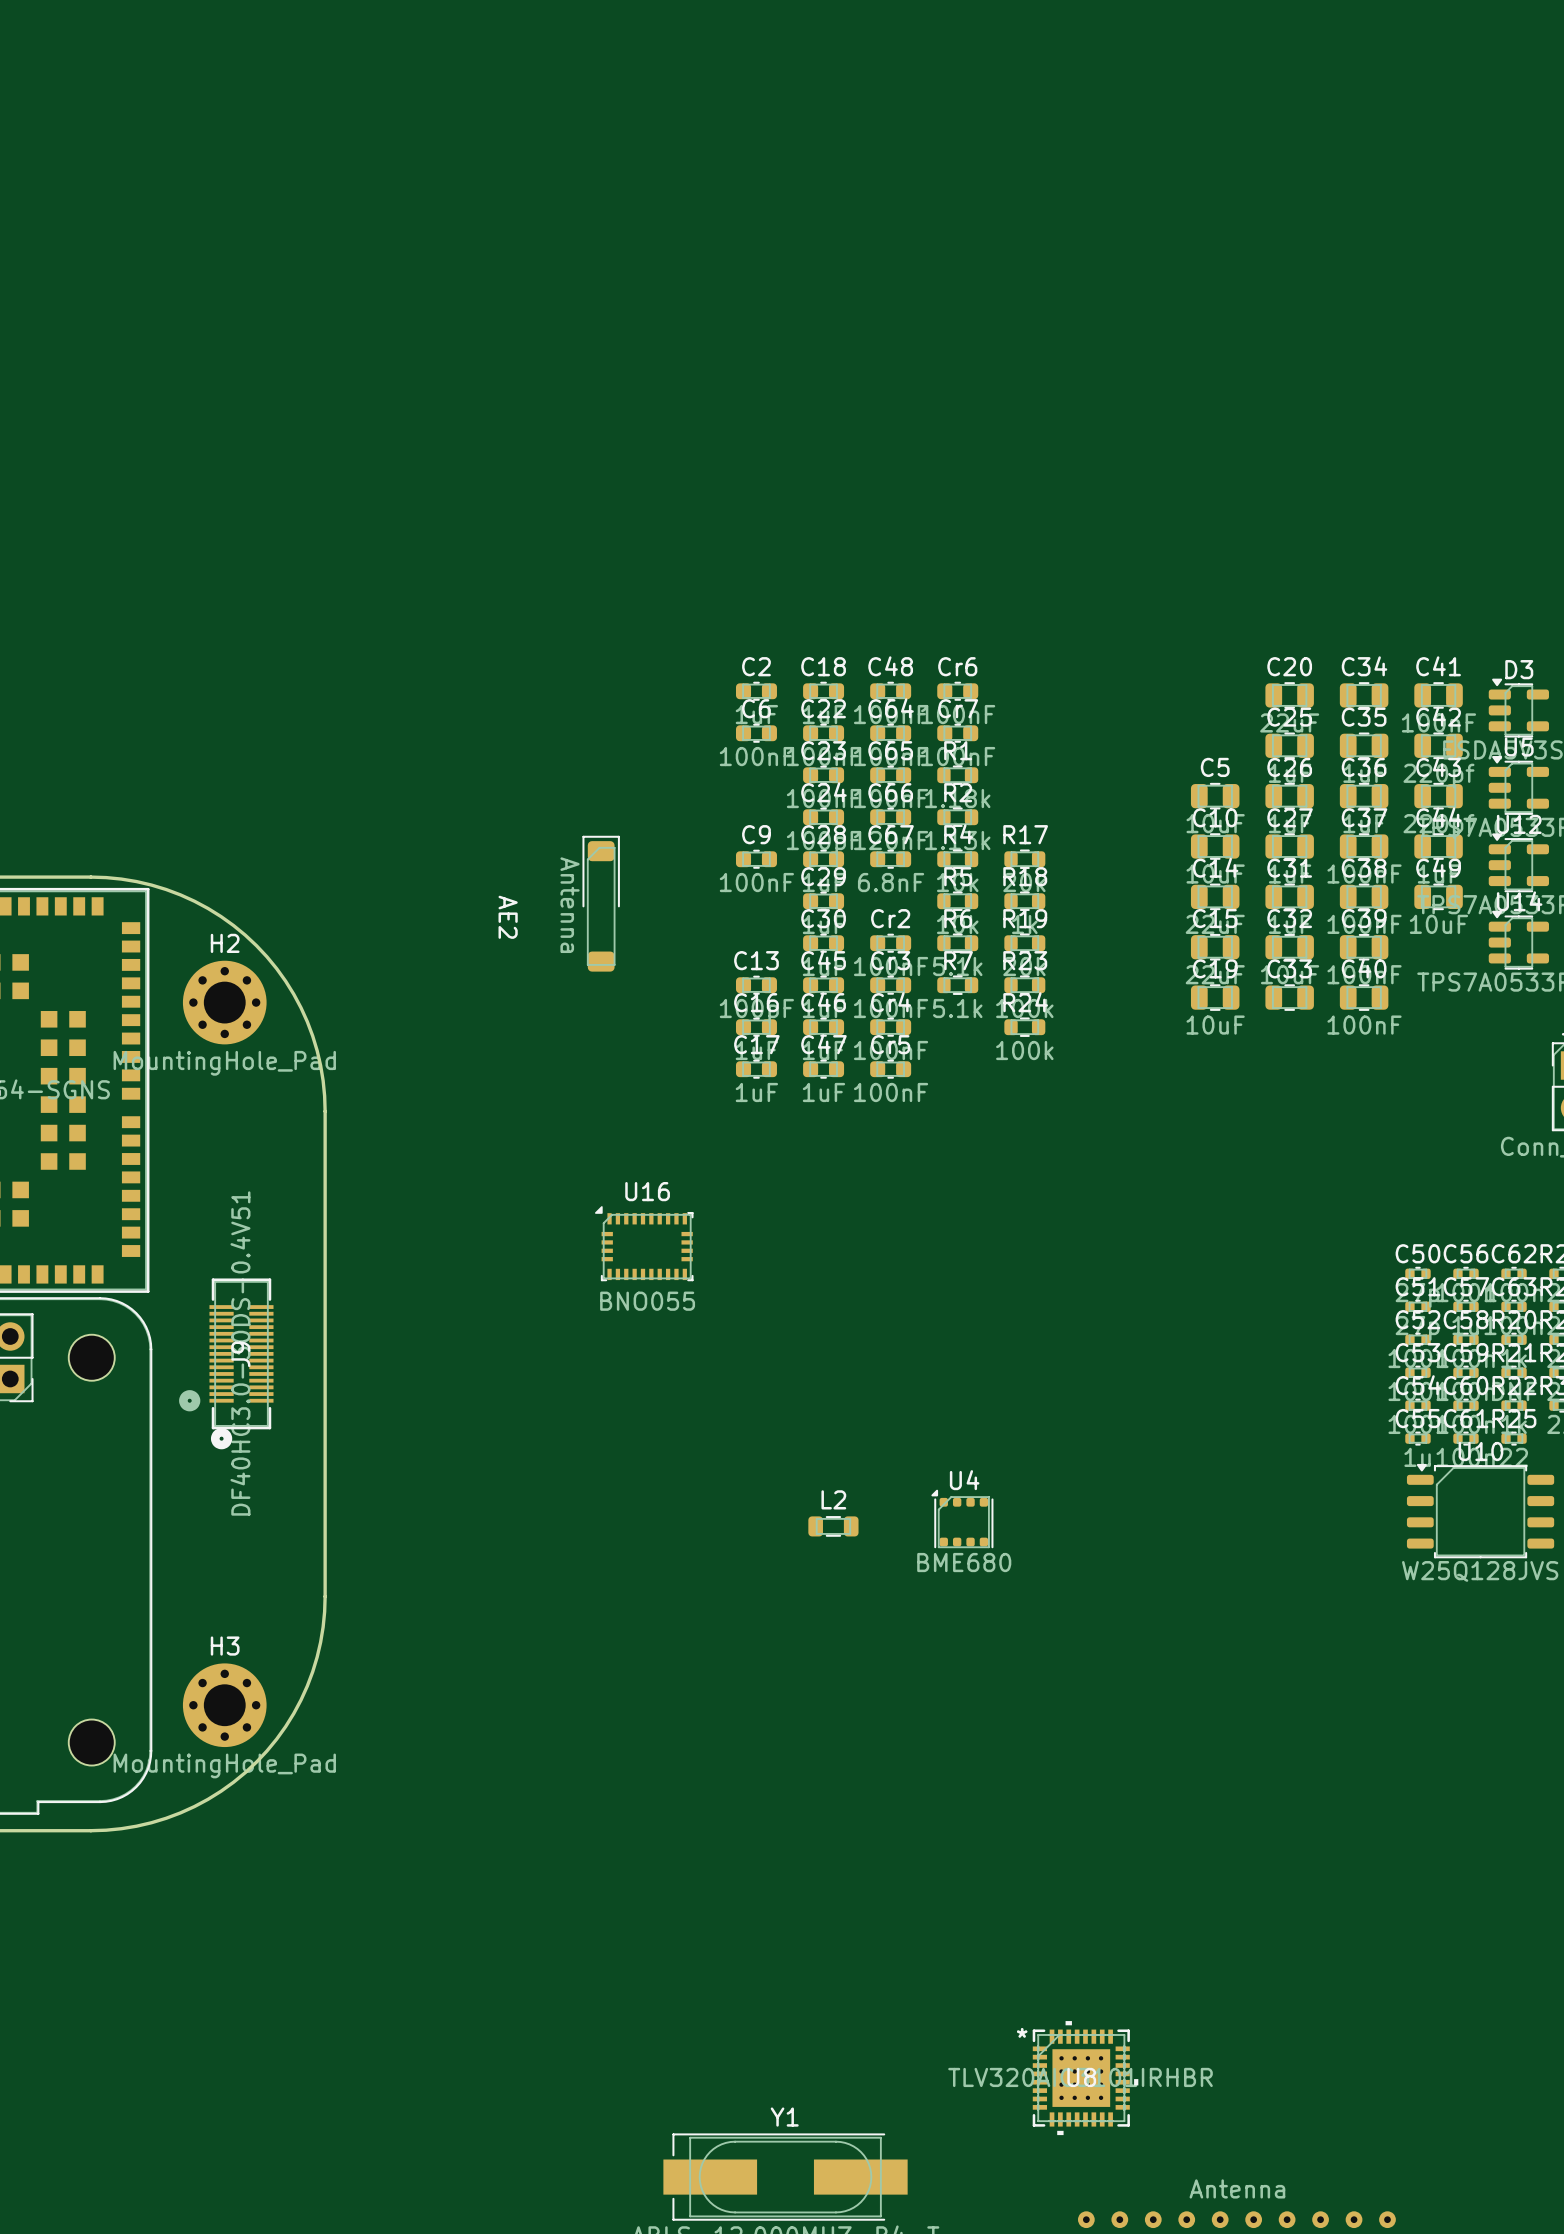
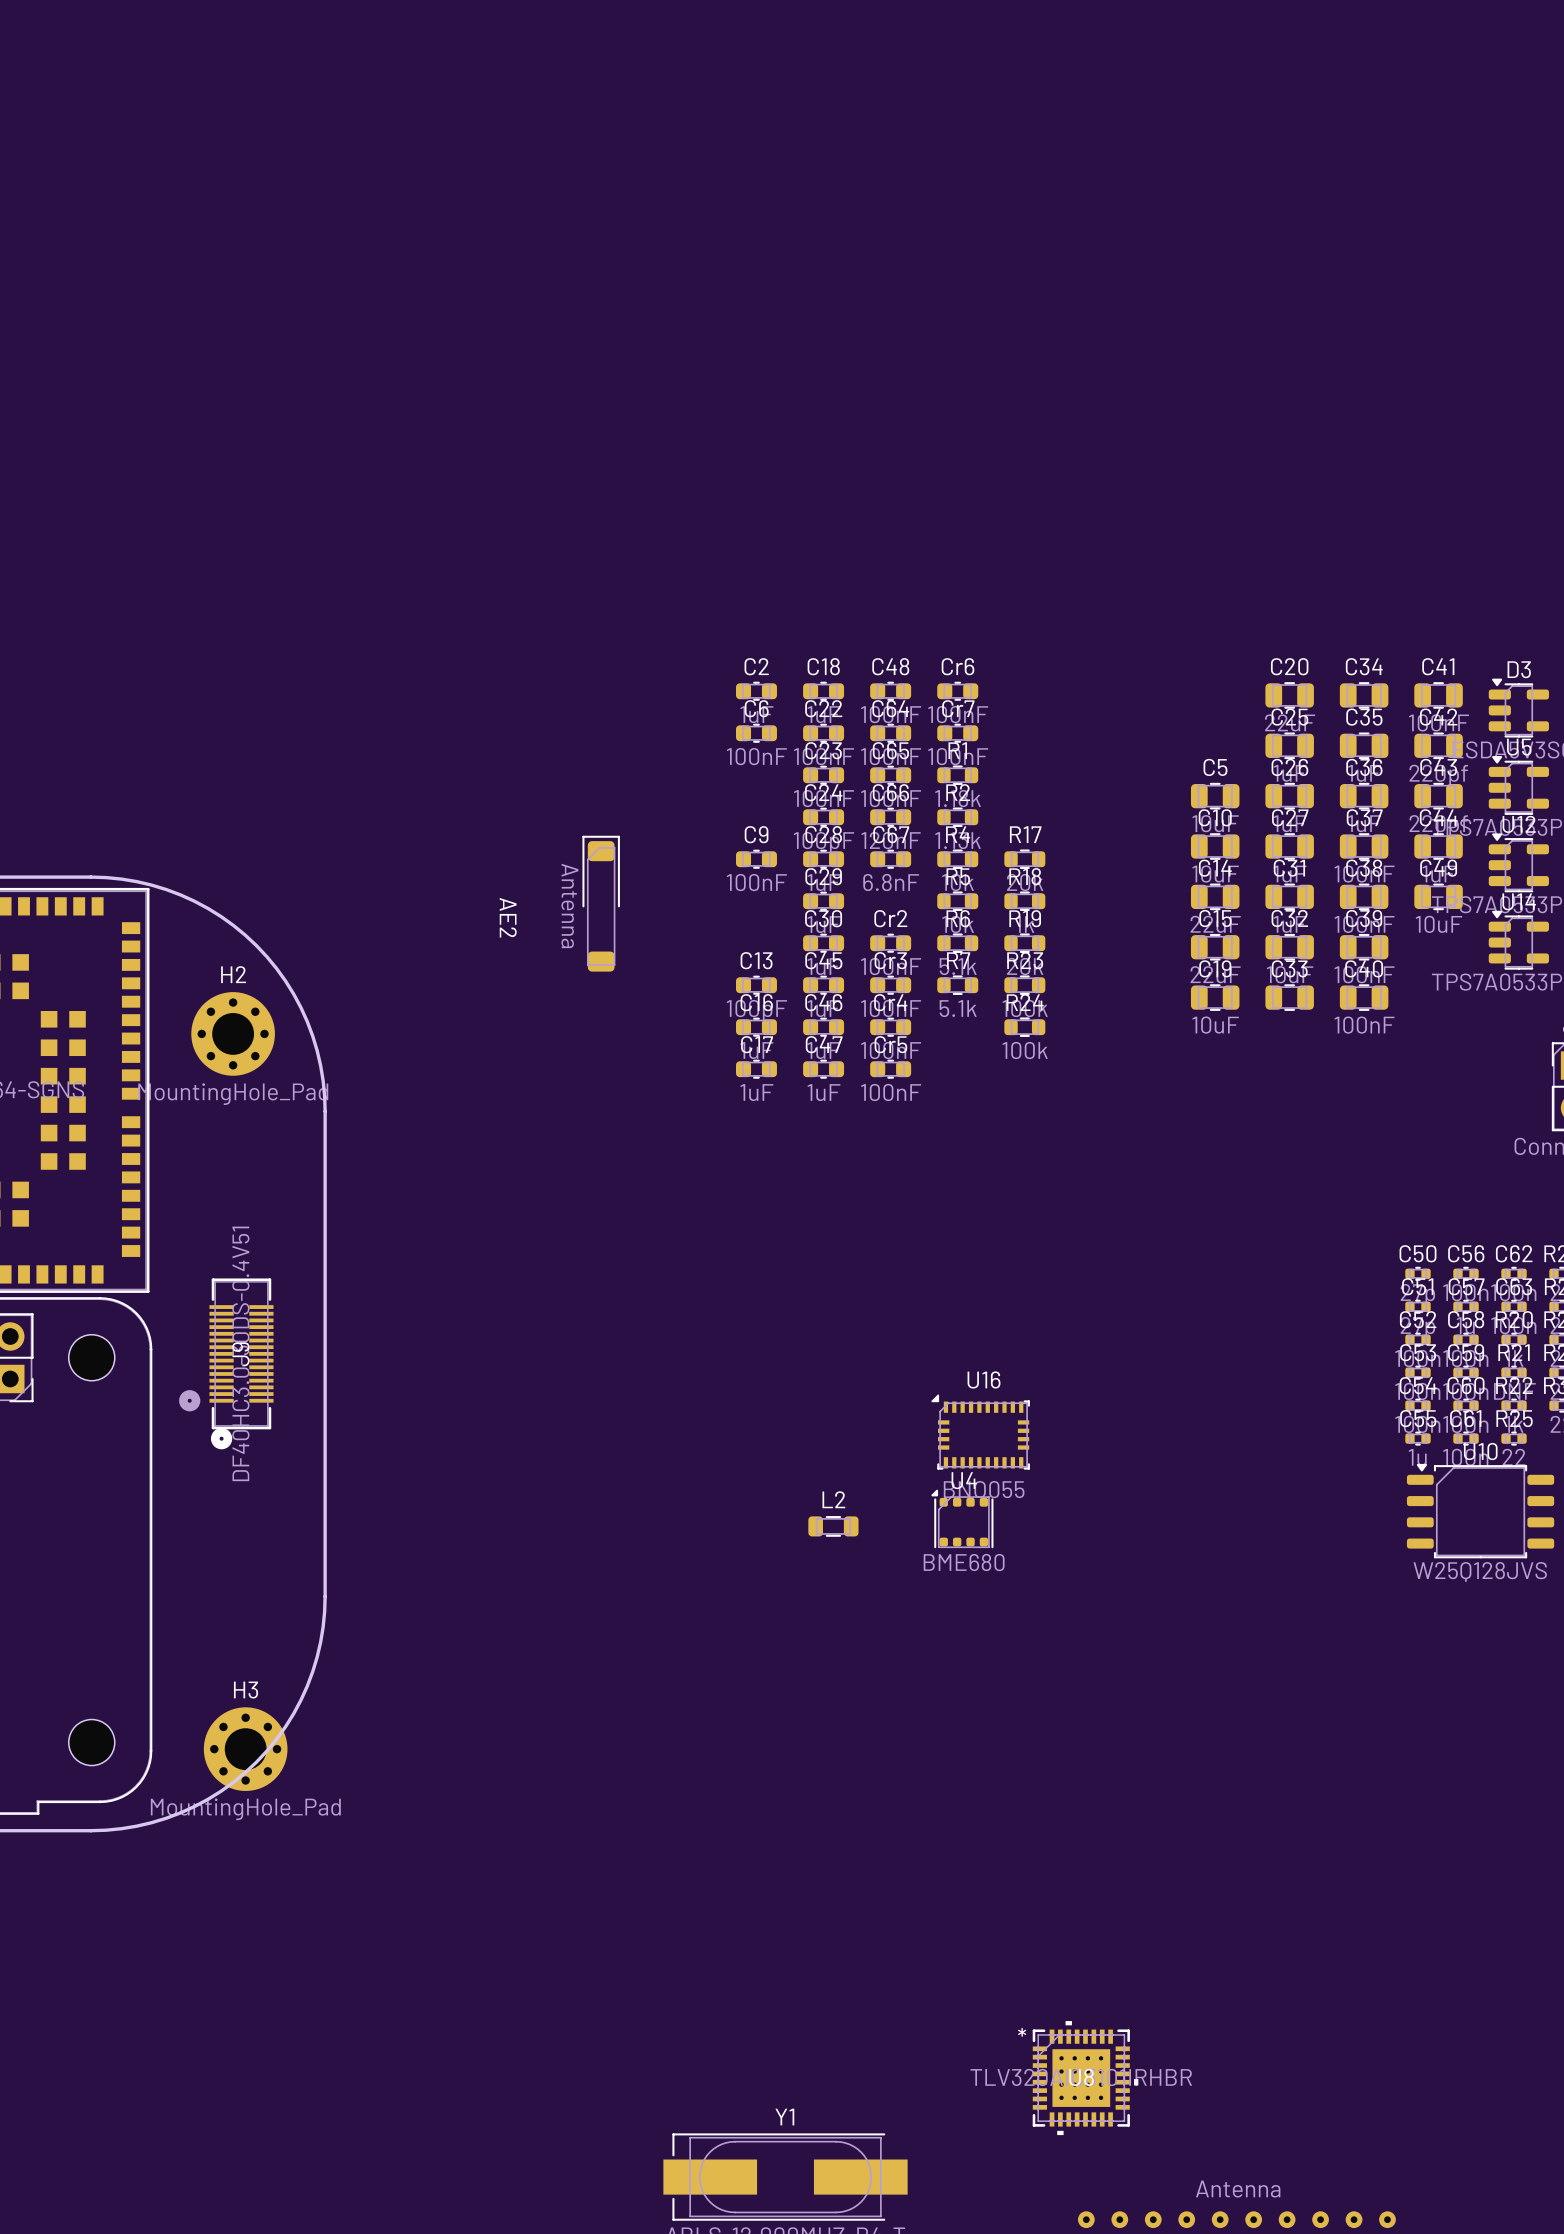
H2 position: (224, 1002) -> (233, 1033)
U16 position: (644, 1243) -> (980, 1432)
H3 position: (224, 1705) -> (245, 1749)

